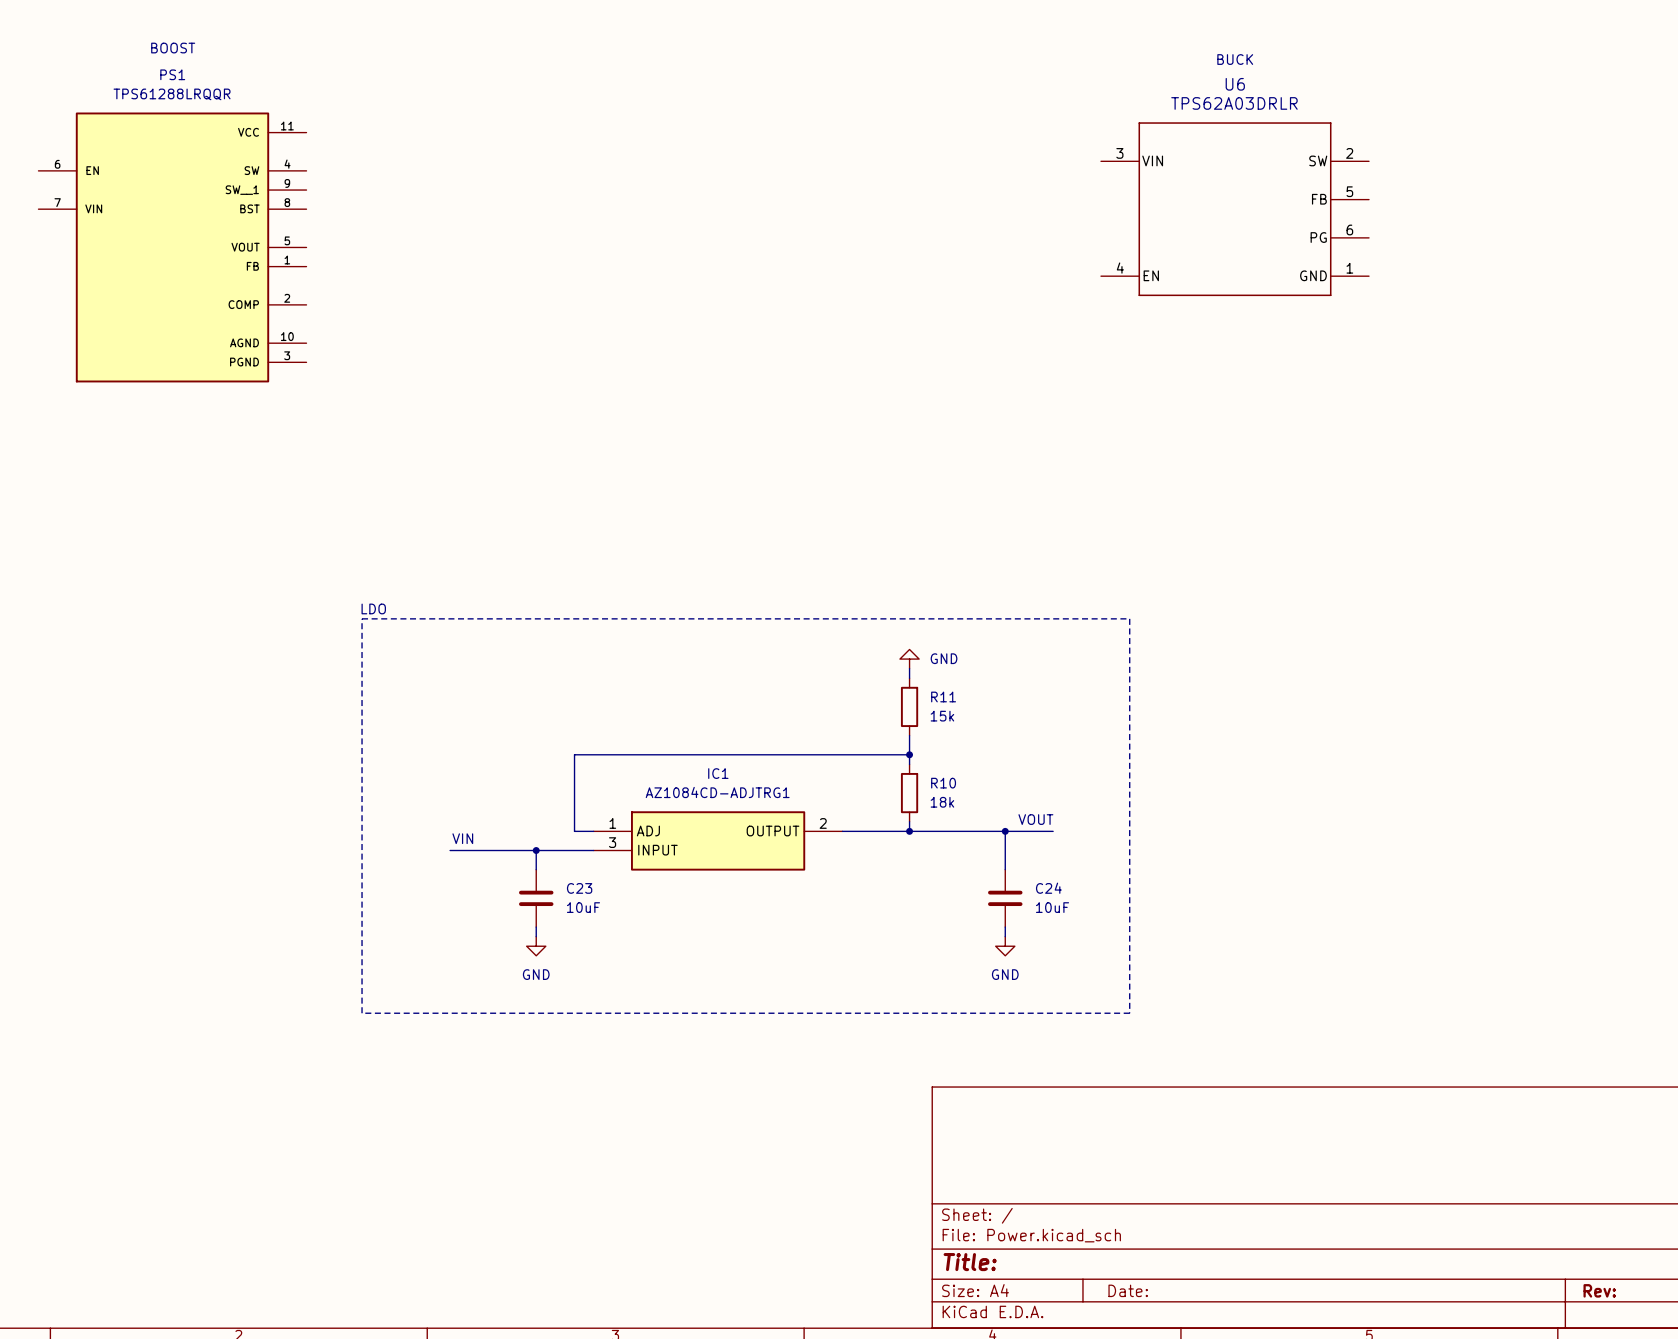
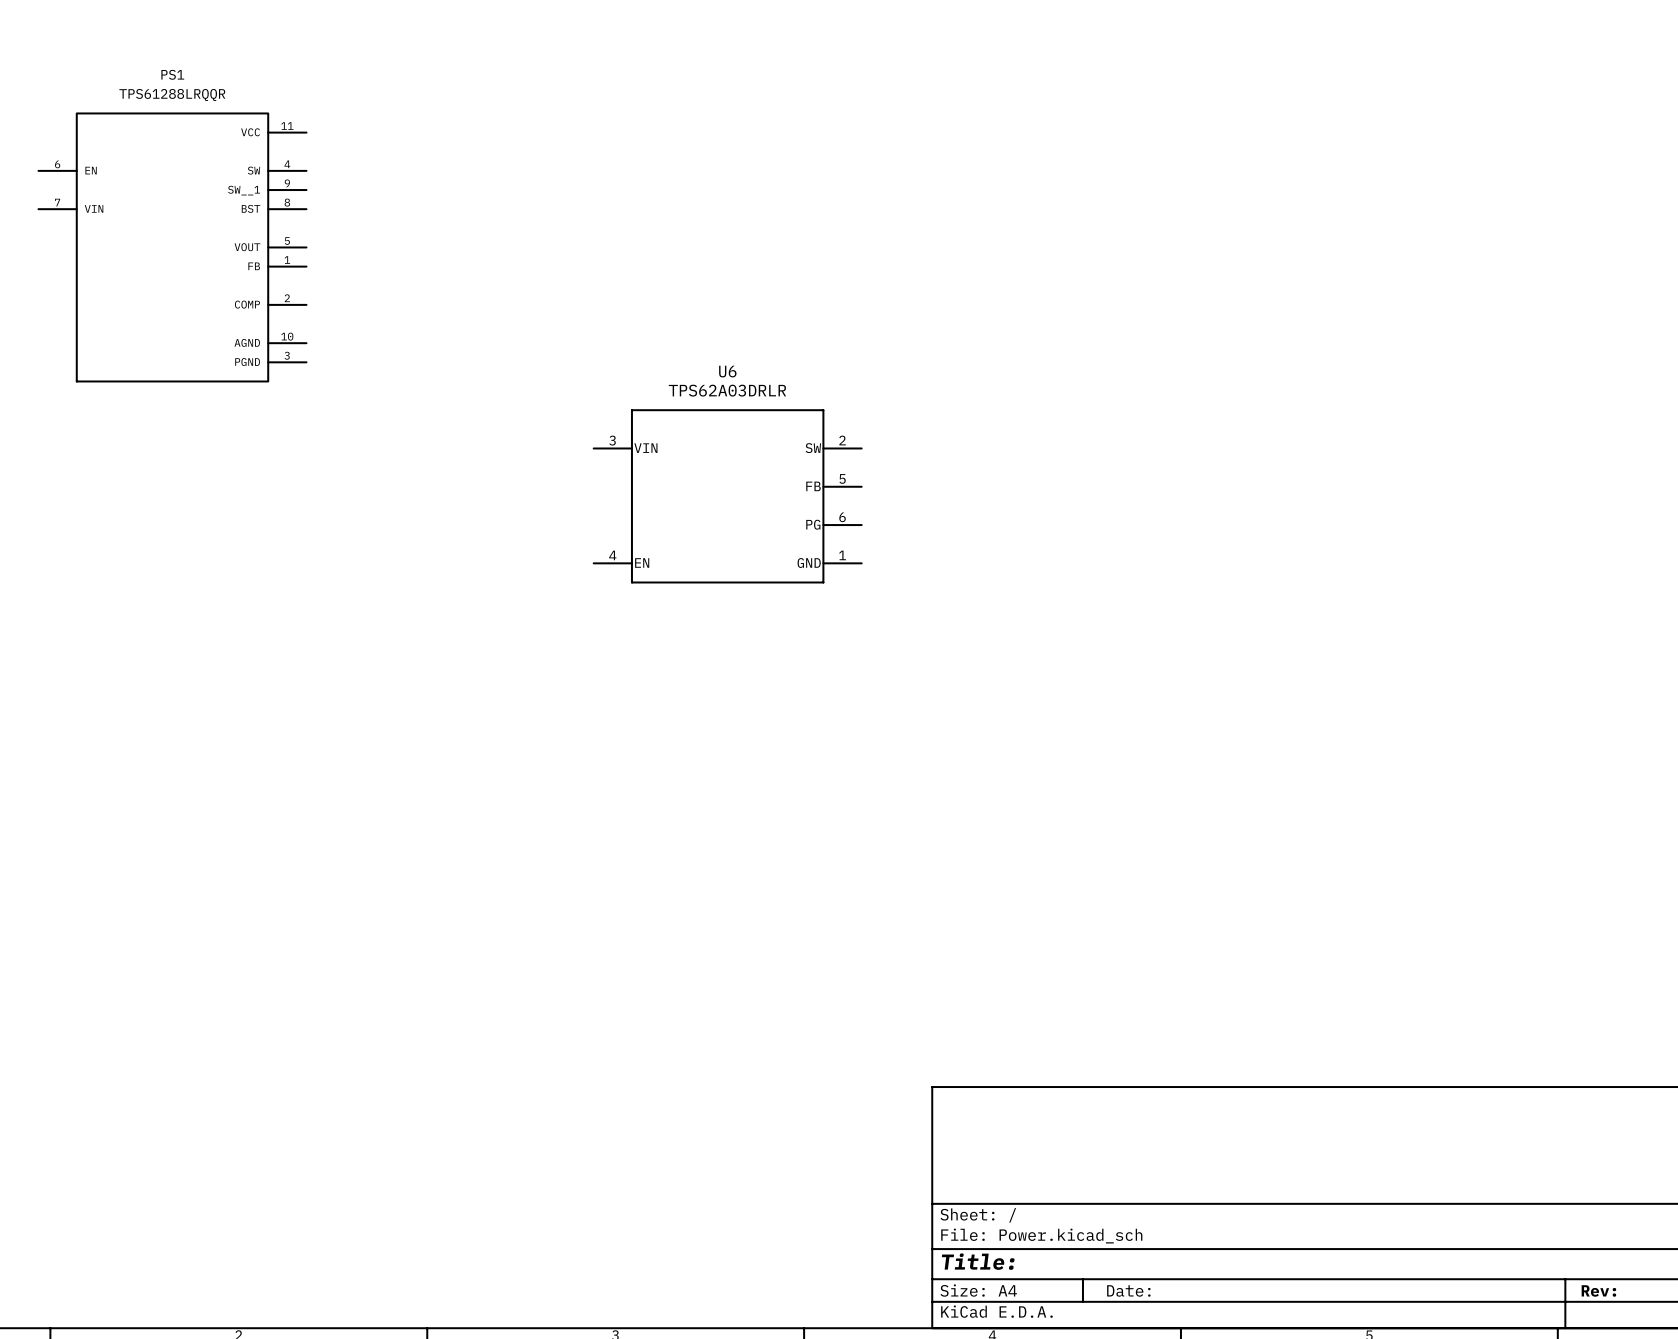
text: BOOST (173, 48) -> none
text: BUCK (1235, 59) -> none
U6 position: (1235, 209) -> (727, 496)
text: LDO (373, 608) -> none
line: (362, 618) (1129, 618) (1129, 1013) (362, 1013) (362, 618) -> none
power symbol: GND (909, 659) -> none
wire: (909, 668) (909, 678) -> none
R11: 15k (909, 706) -> none
wire: (909, 735) (909, 764) -> none
wire: (909, 754) (574, 754) (574, 831) (593, 831) -> none
junction: (909, 754) -> none
R10: 18k (909, 793) -> none
text: VOUT (1035, 819) -> none
wire: (909, 821) (909, 831) -> none
wire: (842, 831) (1053, 831) -> none
junction: (909, 831) -> none
wire: (1005, 831) (1005, 869) -> none
junction: (1005, 831) -> none
text: VIN (462, 838) -> none
IC1: AZ1084CD-ADJTRG1 (718, 840) -> none
wire: (450, 850) (593, 850) -> none
wire: (536, 850) (536, 869) -> none
junction: (536, 850) -> none
C23: 10uF (536, 898) -> none
C24: 10uF (1005, 898) -> none
wire: (536, 927) (536, 936) -> none
wire: (1005, 927) (1005, 936) -> none
power symbol: GND (536, 946) -> none
power symbol: GND (1005, 946) -> none

